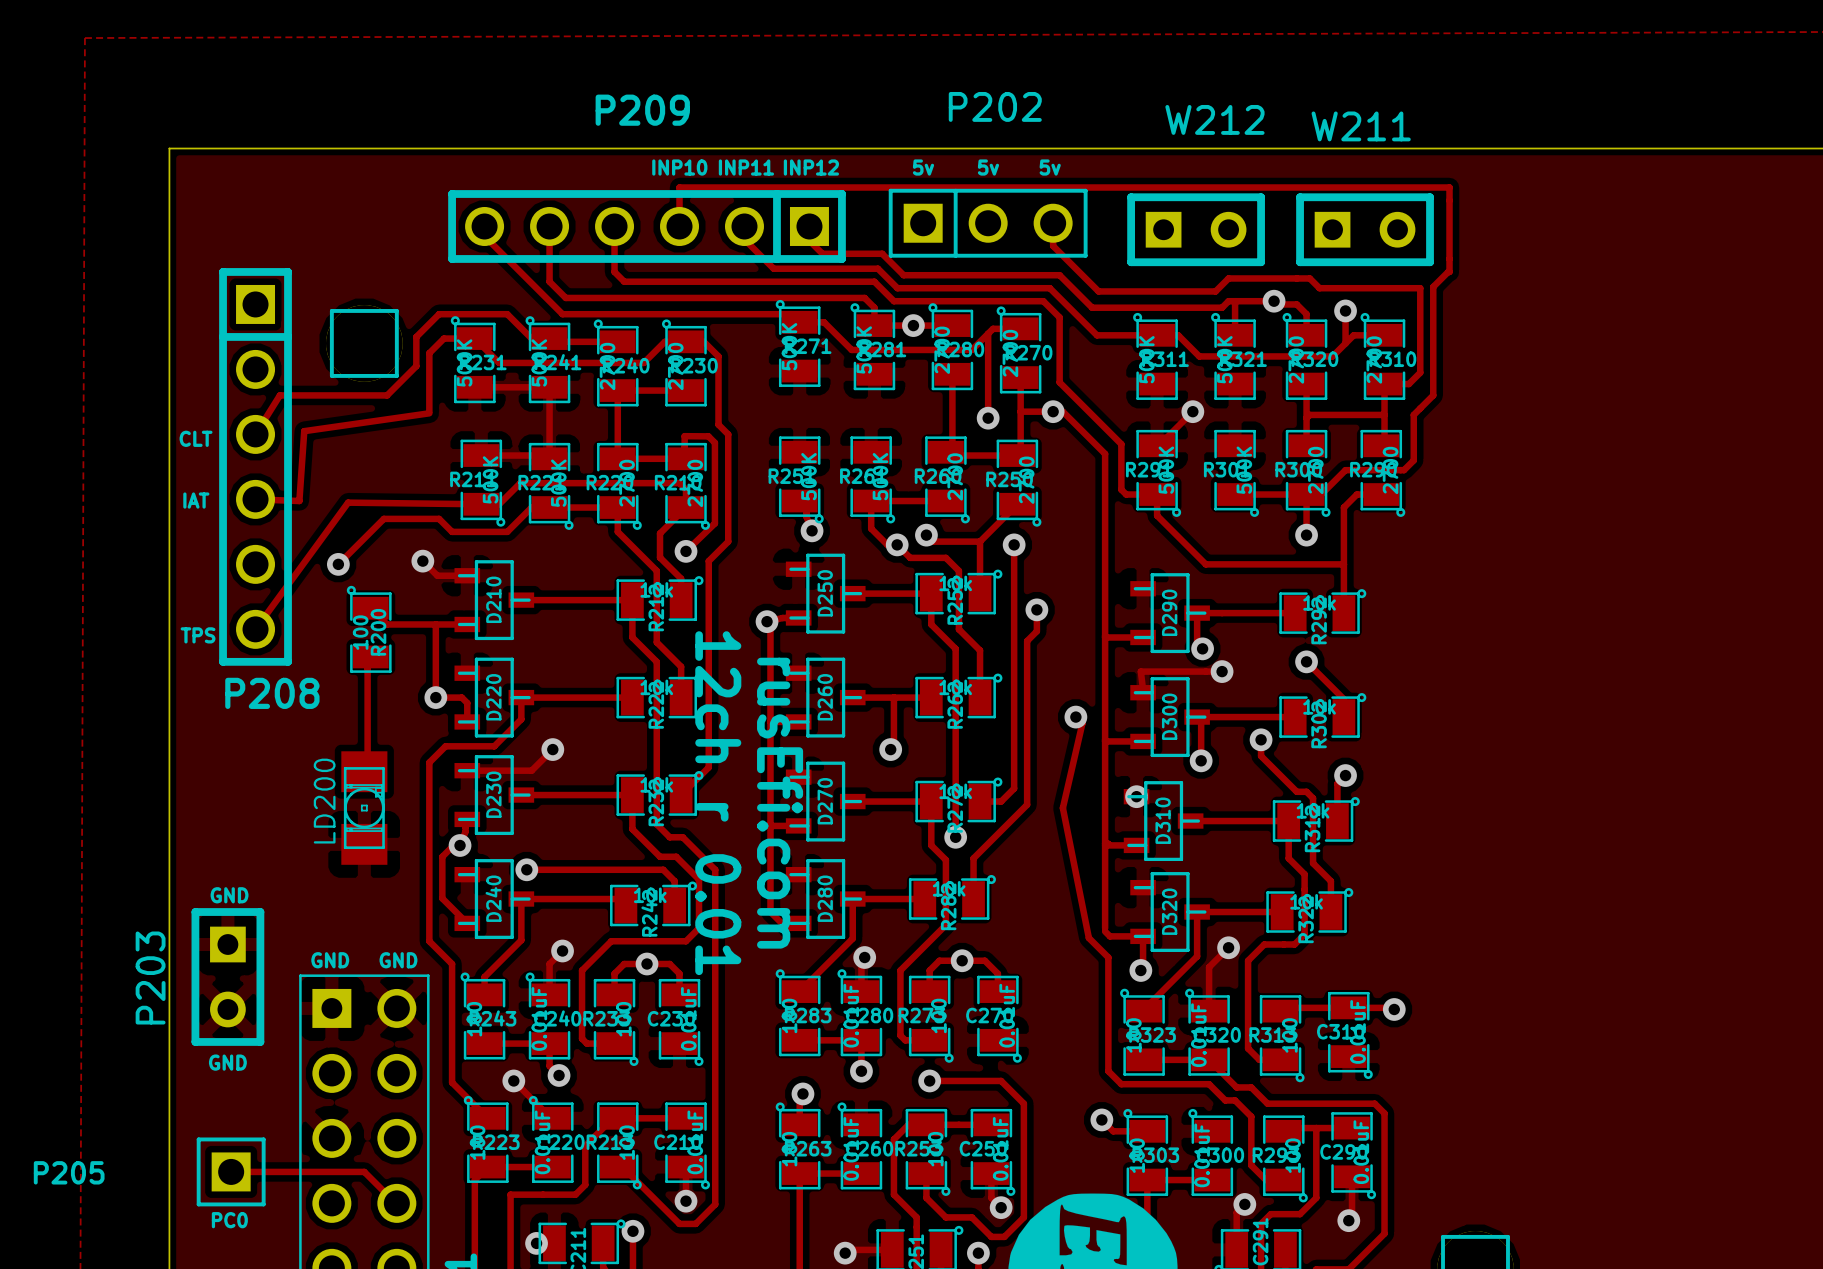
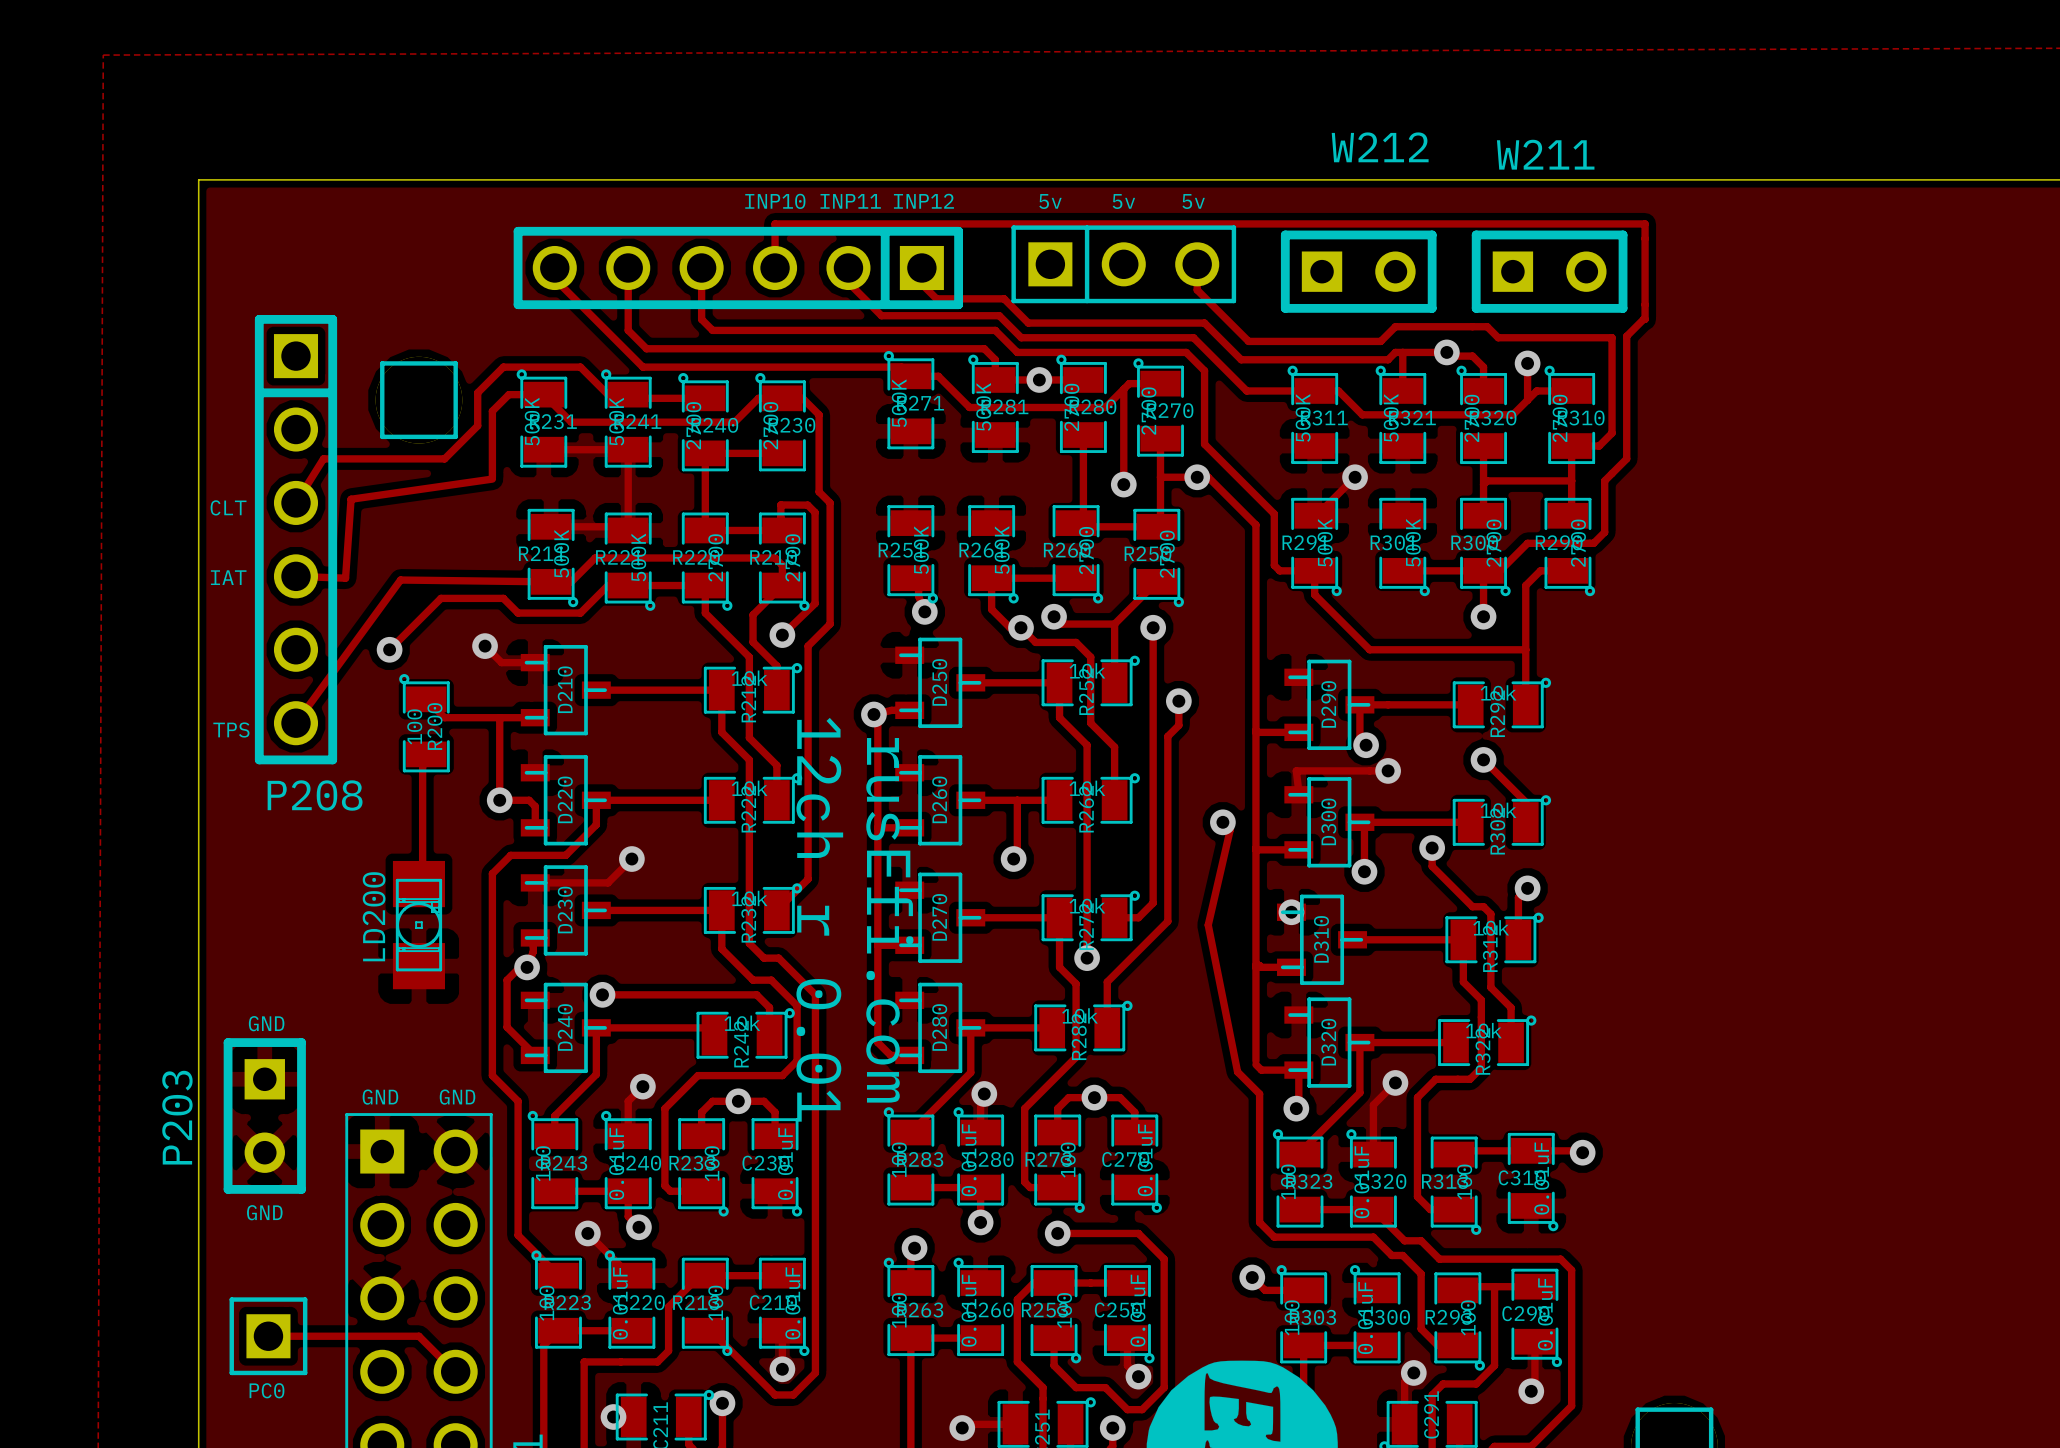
P202 name: P202 (995, 106) -> none
P209 name: P209 (642, 110) -> none
P205 name: P205 (69, 1172) -> none

